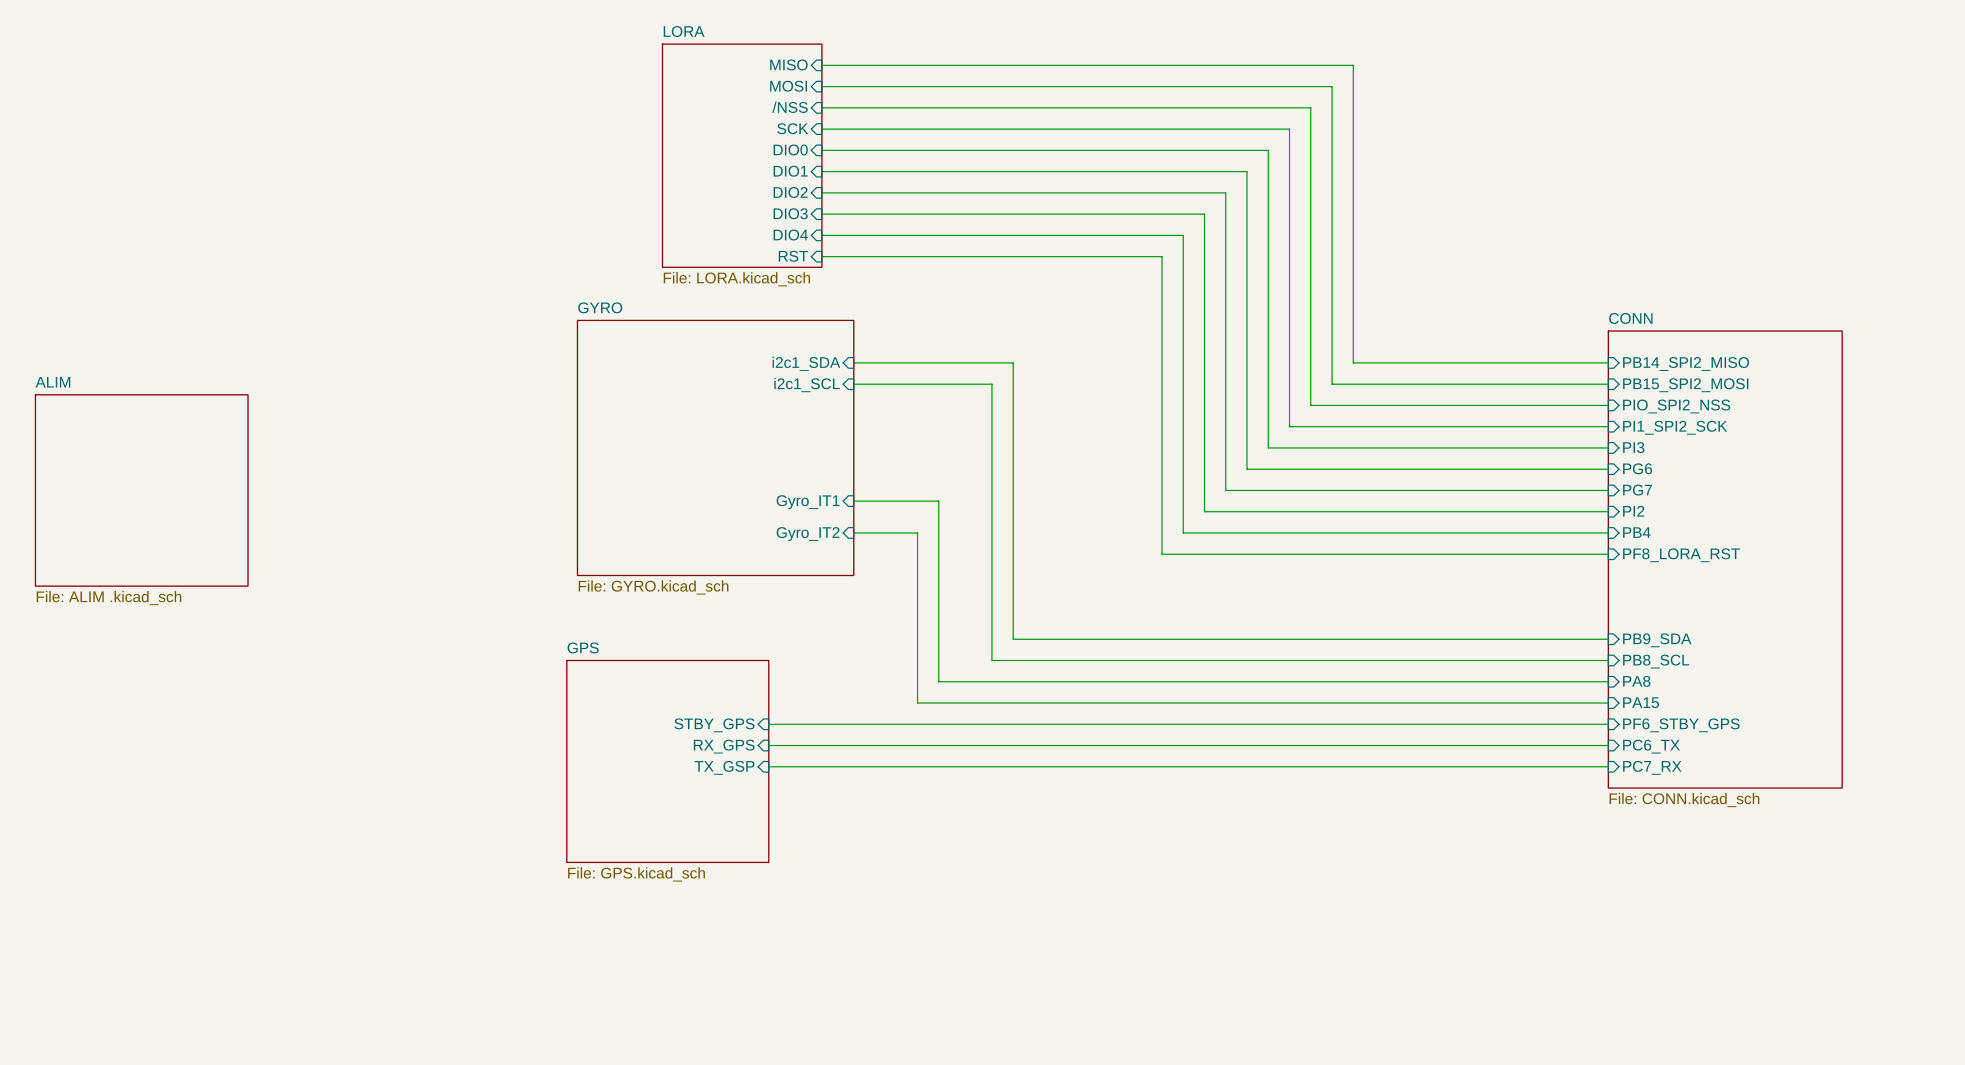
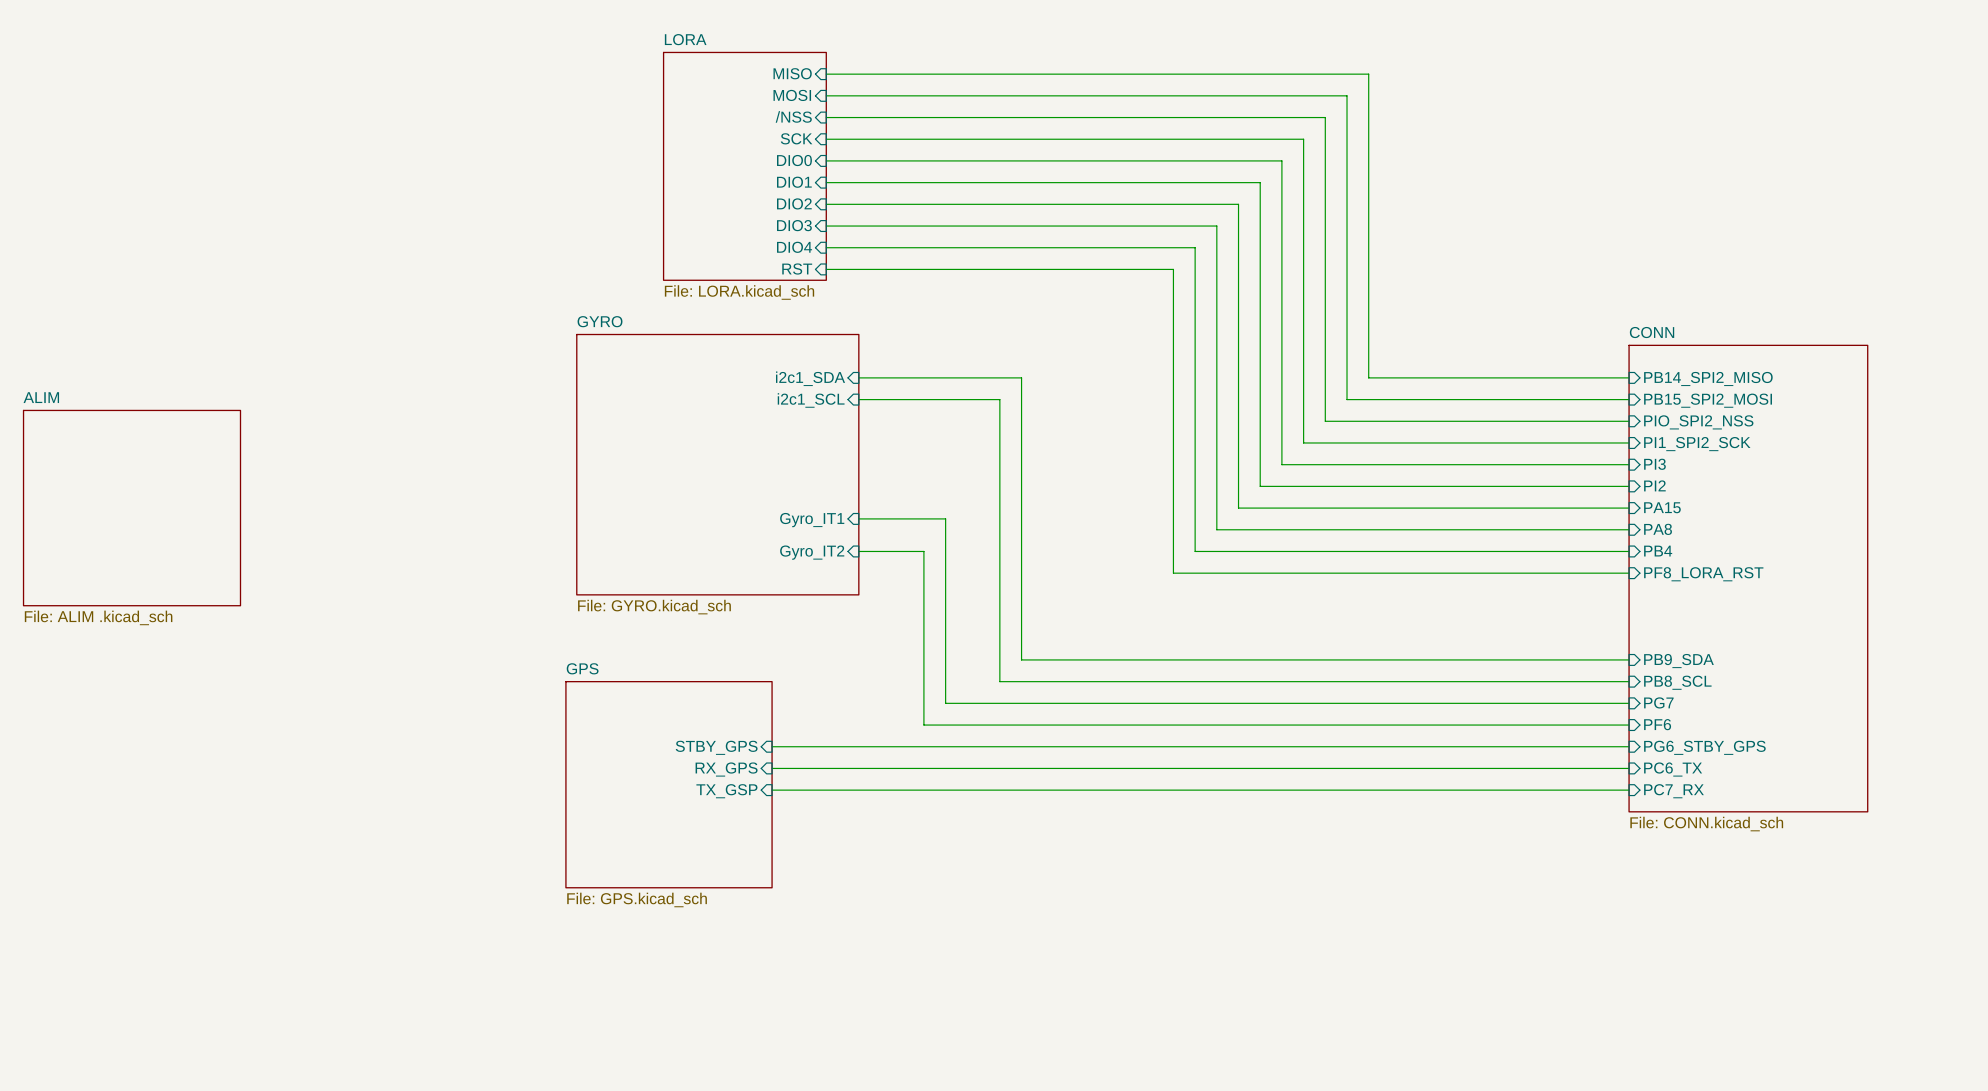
sheet pin: PG6 (1637, 468) -> PI2 (1654, 485)
sheet pin: PG7 (1637, 490) -> PA15 (1662, 507)
sheet pin: PI2 (1633, 511) -> PA8 (1658, 529)
sheet pin: PA8 (1636, 681) -> PG7 (1658, 702)
sheet pin: PA15 (1641, 702) -> PF6 (1657, 724)
sheet pin: PF6_STBY_GPS (1681, 725) -> PG6_STBY_GPS (1704, 747)

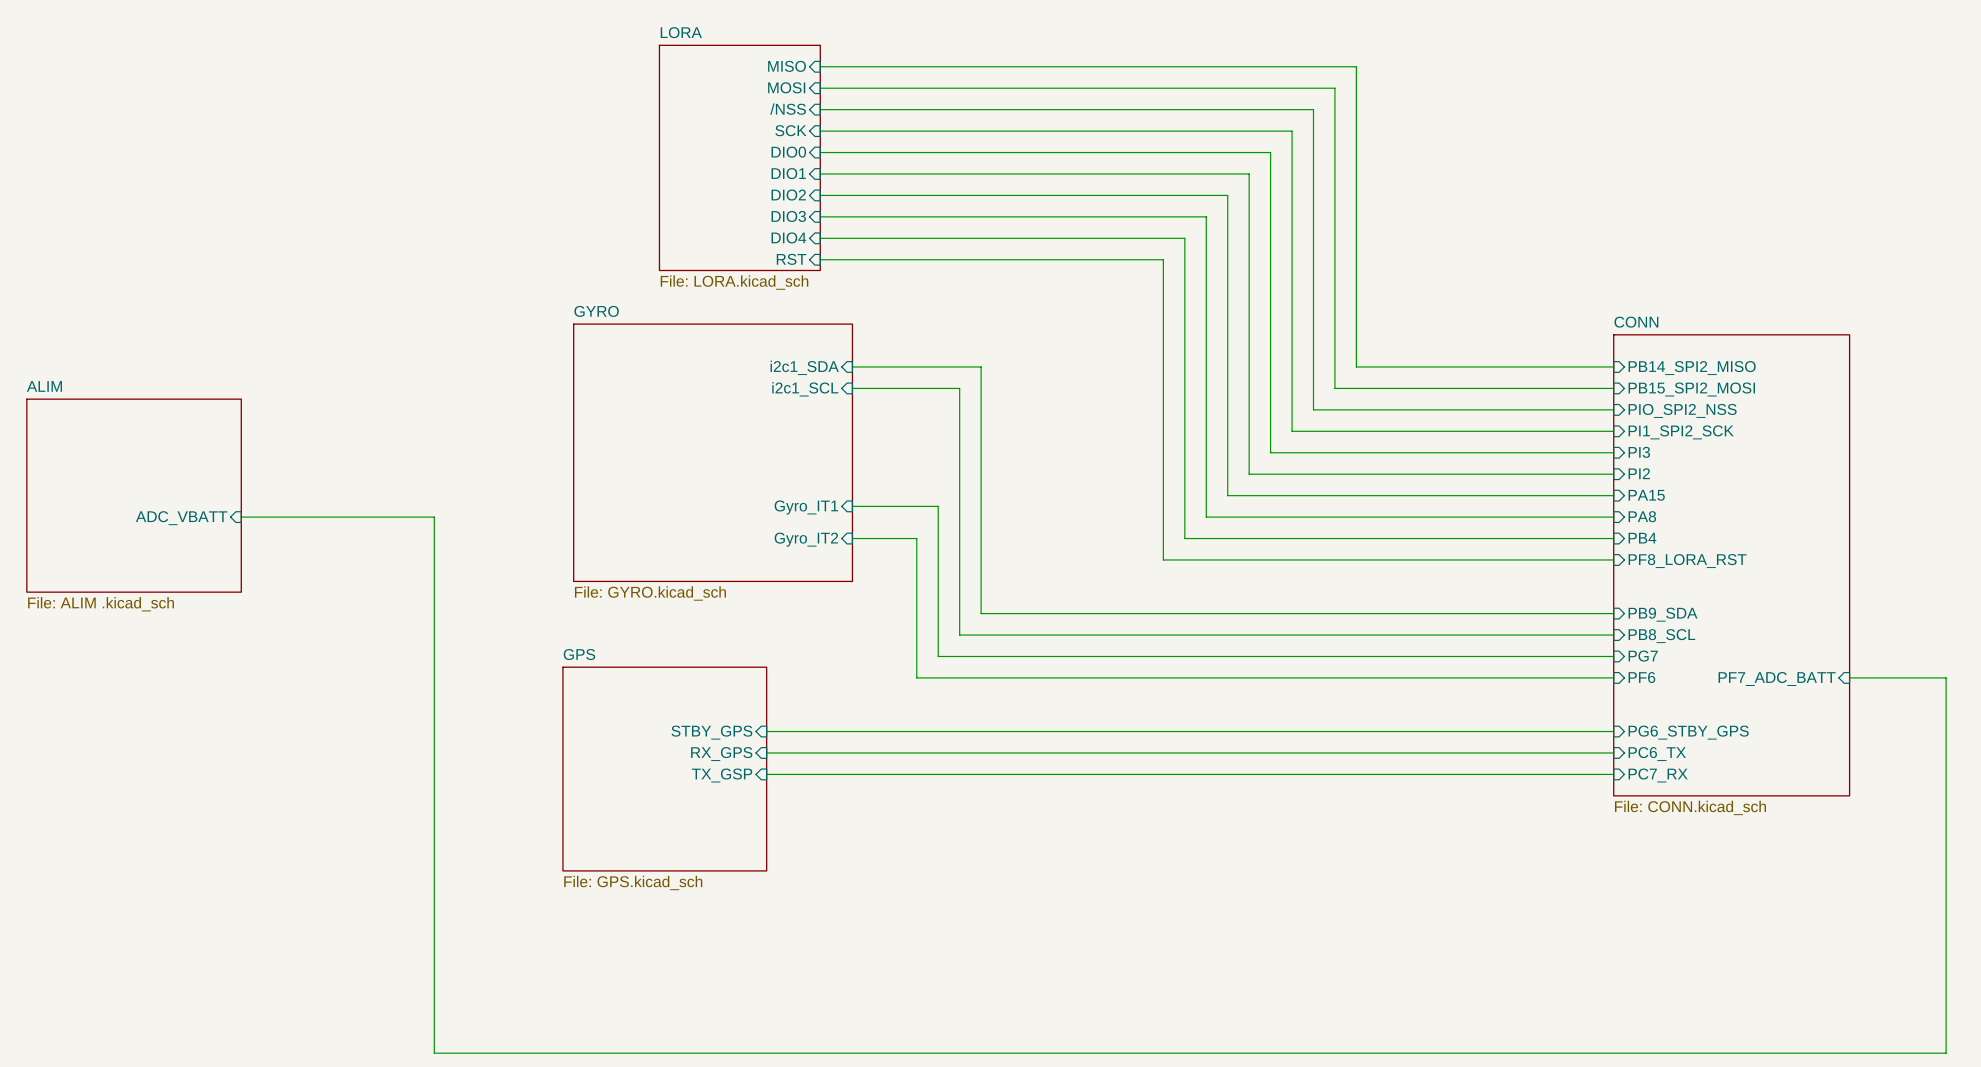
wire: (989, 377) (1021, 377) (1021, 659) (1629, 659) -> (981, 366) (981, 613) (1613, 613)
wire: (967, 399) (999, 399) (999, 681) (1629, 681) -> (959, 388) (959, 635) (1613, 635)
wire: none -> (241, 517) (434, 517) (434, 1053) (1946, 1053) (1946, 677) (1849, 677)
sheet pin: none -> ADC_VBATT (181, 518)
sheet pin position: PB9_SDA (1678, 661) -> PB9_SDA (1663, 614)
wire: (945, 670) (945, 703) (1629, 703) -> (938, 656) (1613, 656)
sheet pin position: PB8_SCL (1677, 682) -> PB8_SCL (1661, 636)
wire: (923, 692) (923, 725) (1629, 725) -> (916, 677) (1613, 677)
sheet pin: none -> PF7_ADC_BATT (1777, 678)
sheet pin position: PG7 (1658, 702) -> PG7 (1643, 656)
sheet pin position: PF6 (1657, 724) -> PF6 (1641, 677)

